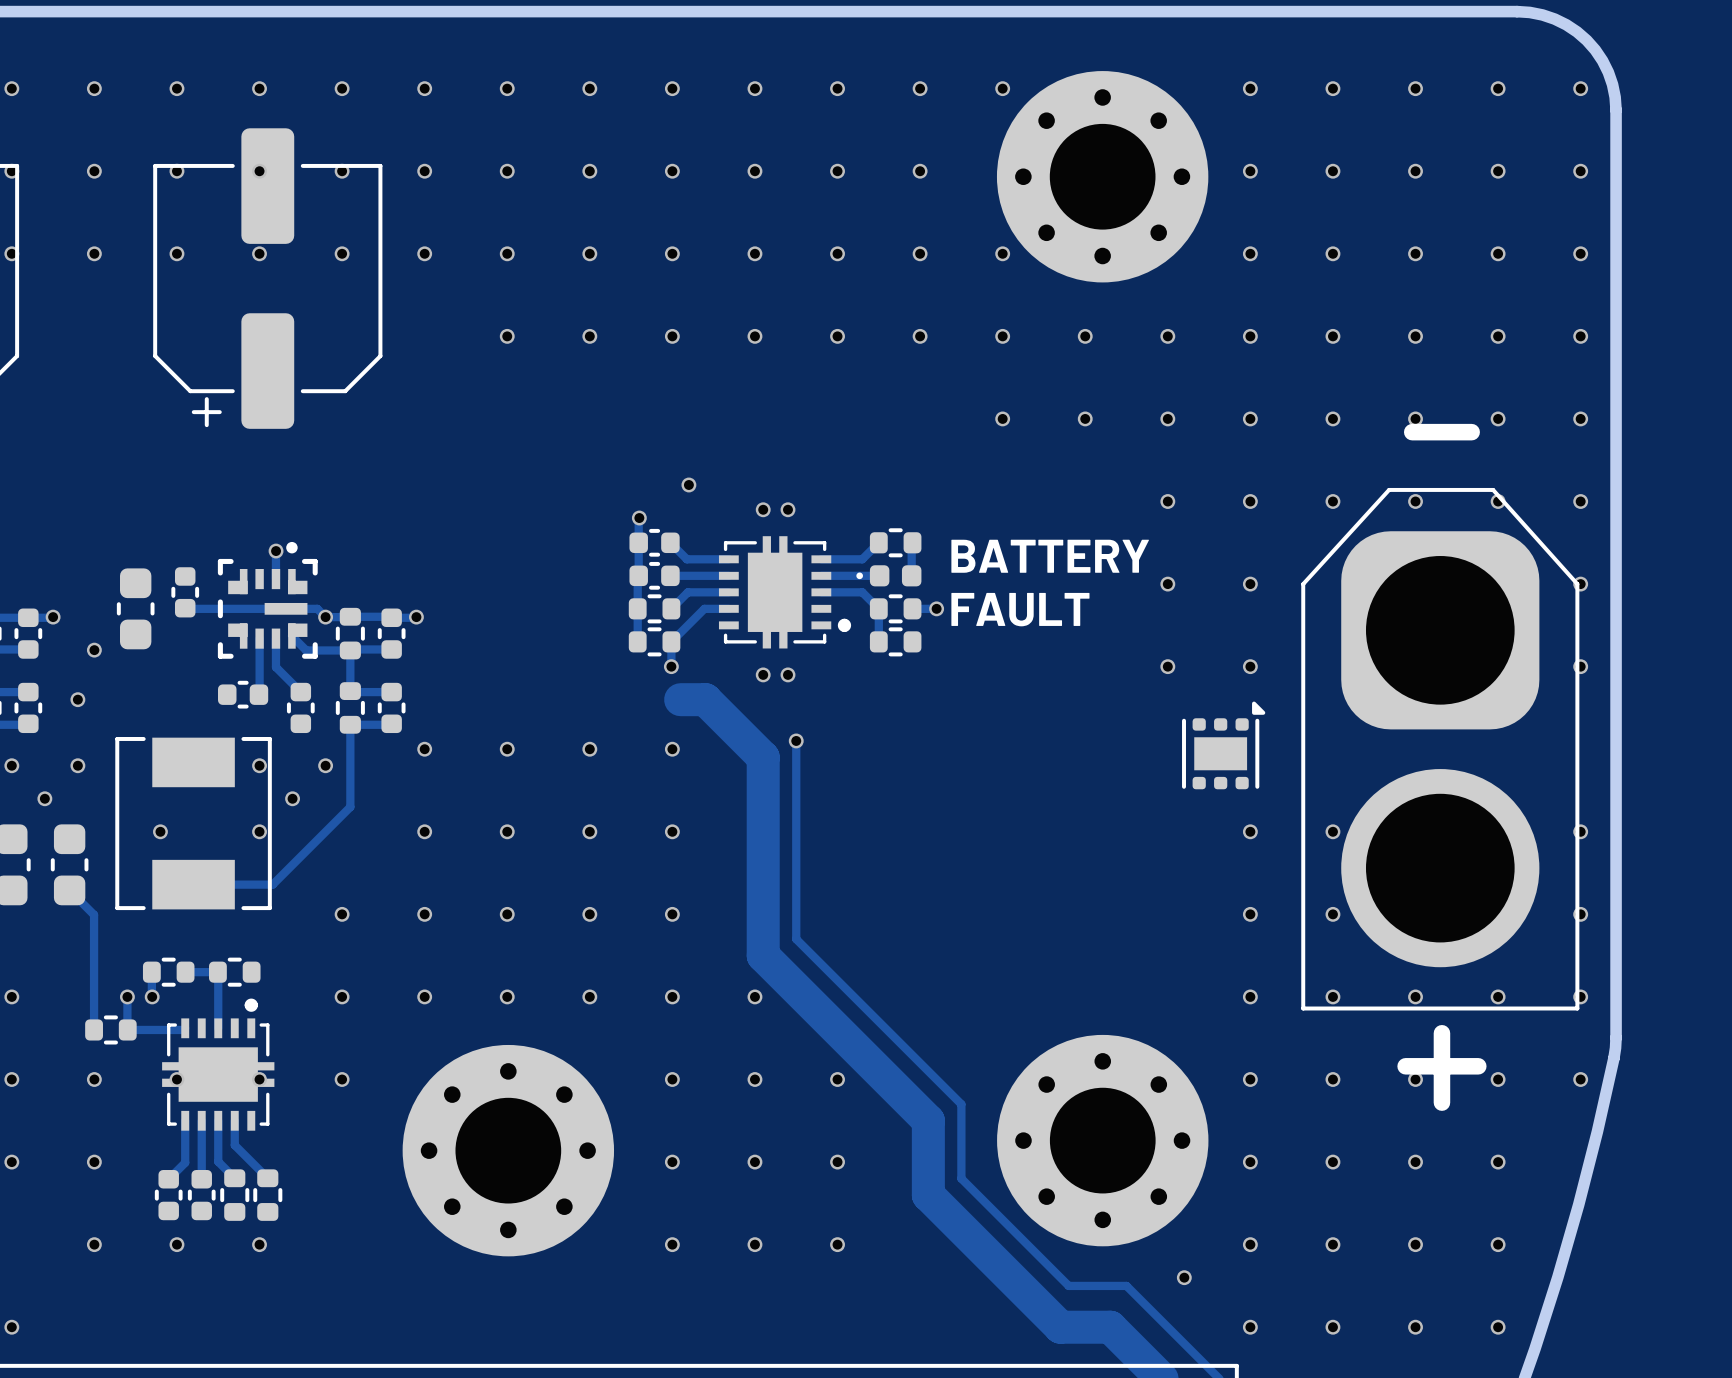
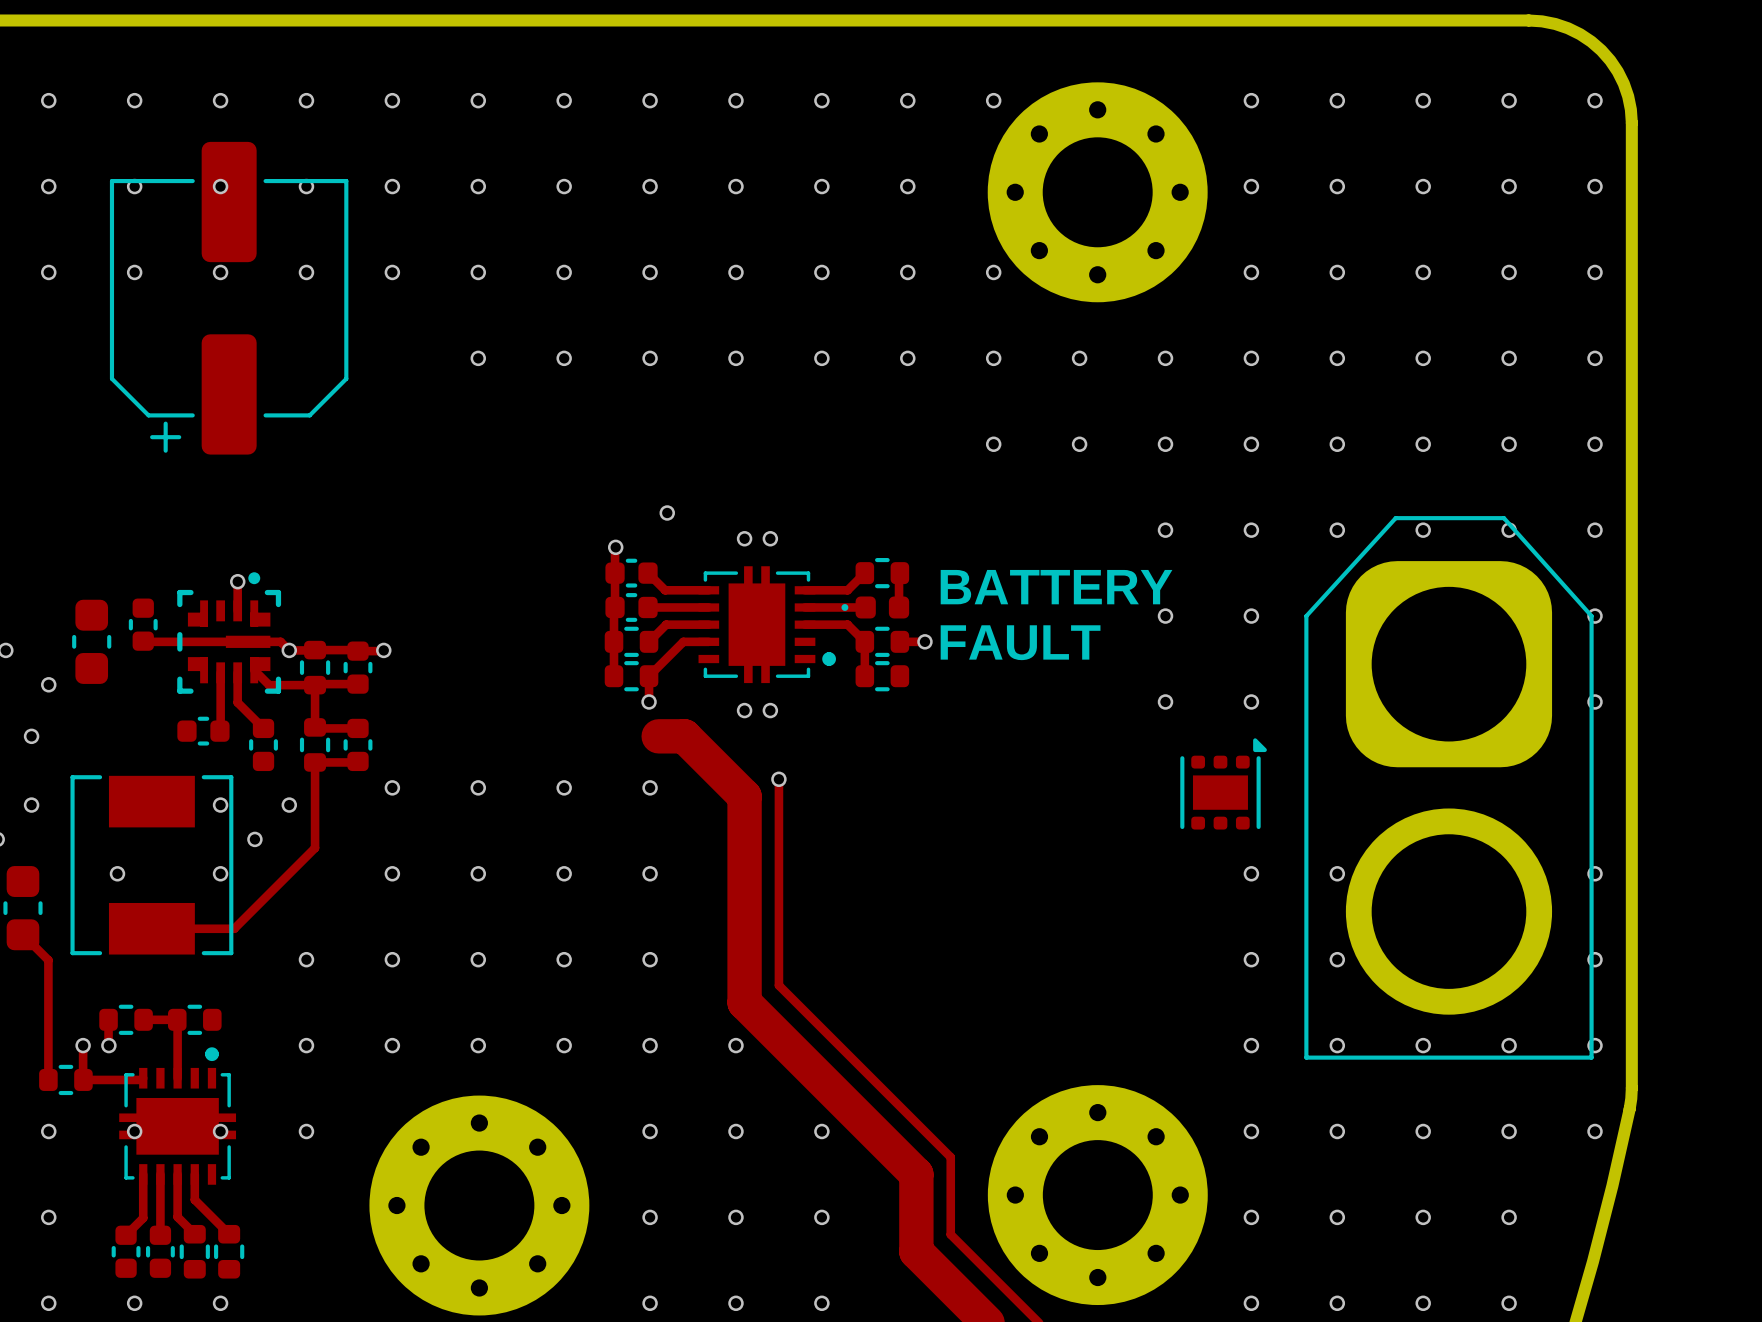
line: (1412, 432) (1471, 432) -> none
line: (1441, 1033) (1441, 1102) -> none
line: (1405, 1066) (1478, 1066) -> none

